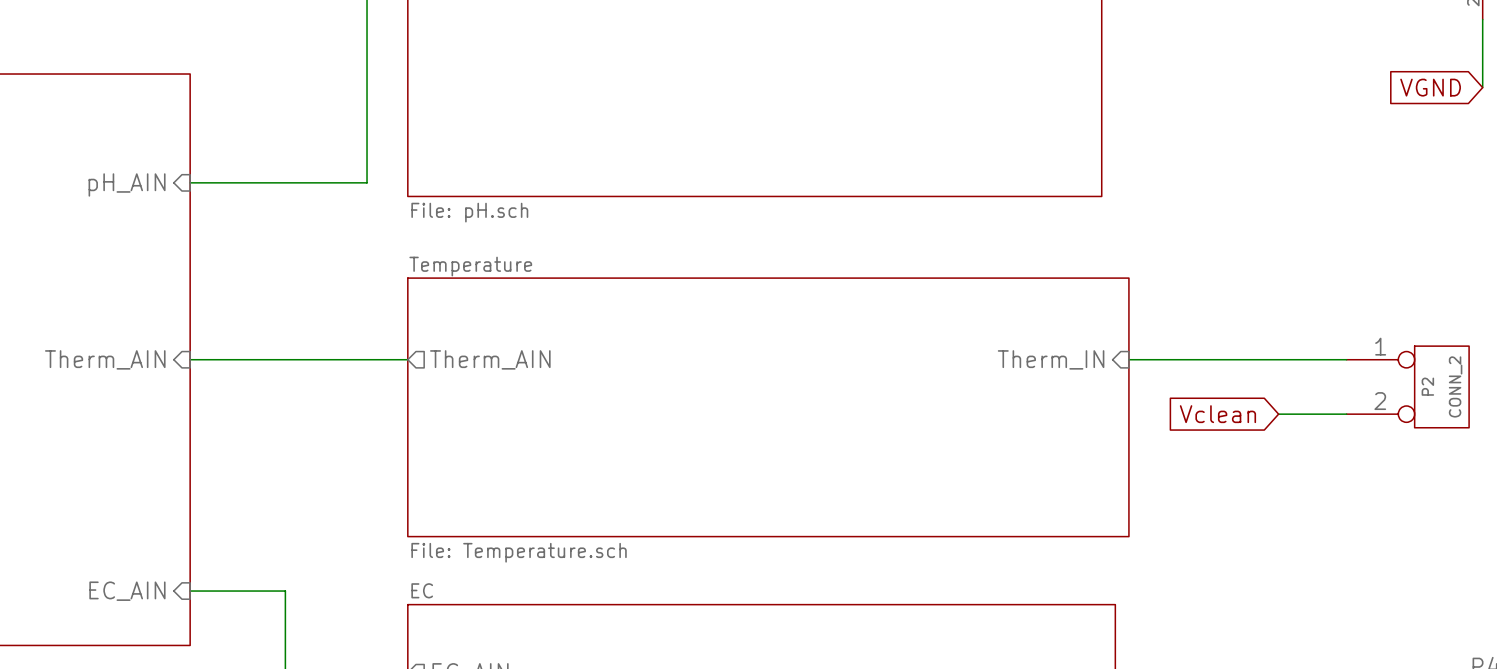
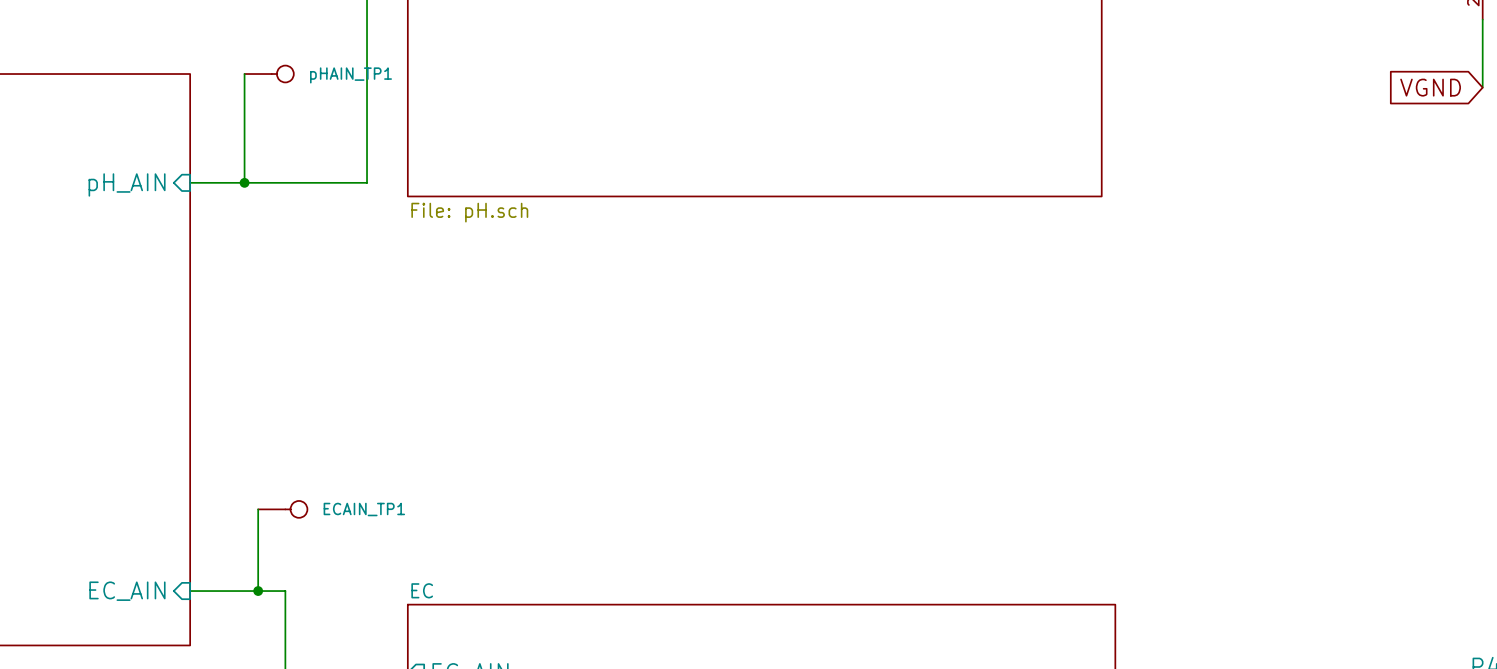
wire: none -> (244, 74) (244, 182)
pHAIN_TP1: none -> (269, 74)
junction: none -> (244, 182)
sheet pin: Therm_AIN (105, 359) -> none
wire: (190, 359) (407, 359) -> none
sheet pin: Therm_AIN (490, 359) -> none
sheet pin: Therm_IN (1051, 359) -> none
wire: (1128, 359) (1346, 359) -> none
P2: CONN_2 (1407, 386) -> none
sheet Temperature: File: Temperature.sch (768, 407) -> none
global label: Vclean (1217, 414) -> none
wire: (1278, 414) (1346, 414) -> none
wire: none -> (258, 509) (258, 591)
ECAIN_TP1: none -> (282, 509)
junction: none -> (258, 591)

